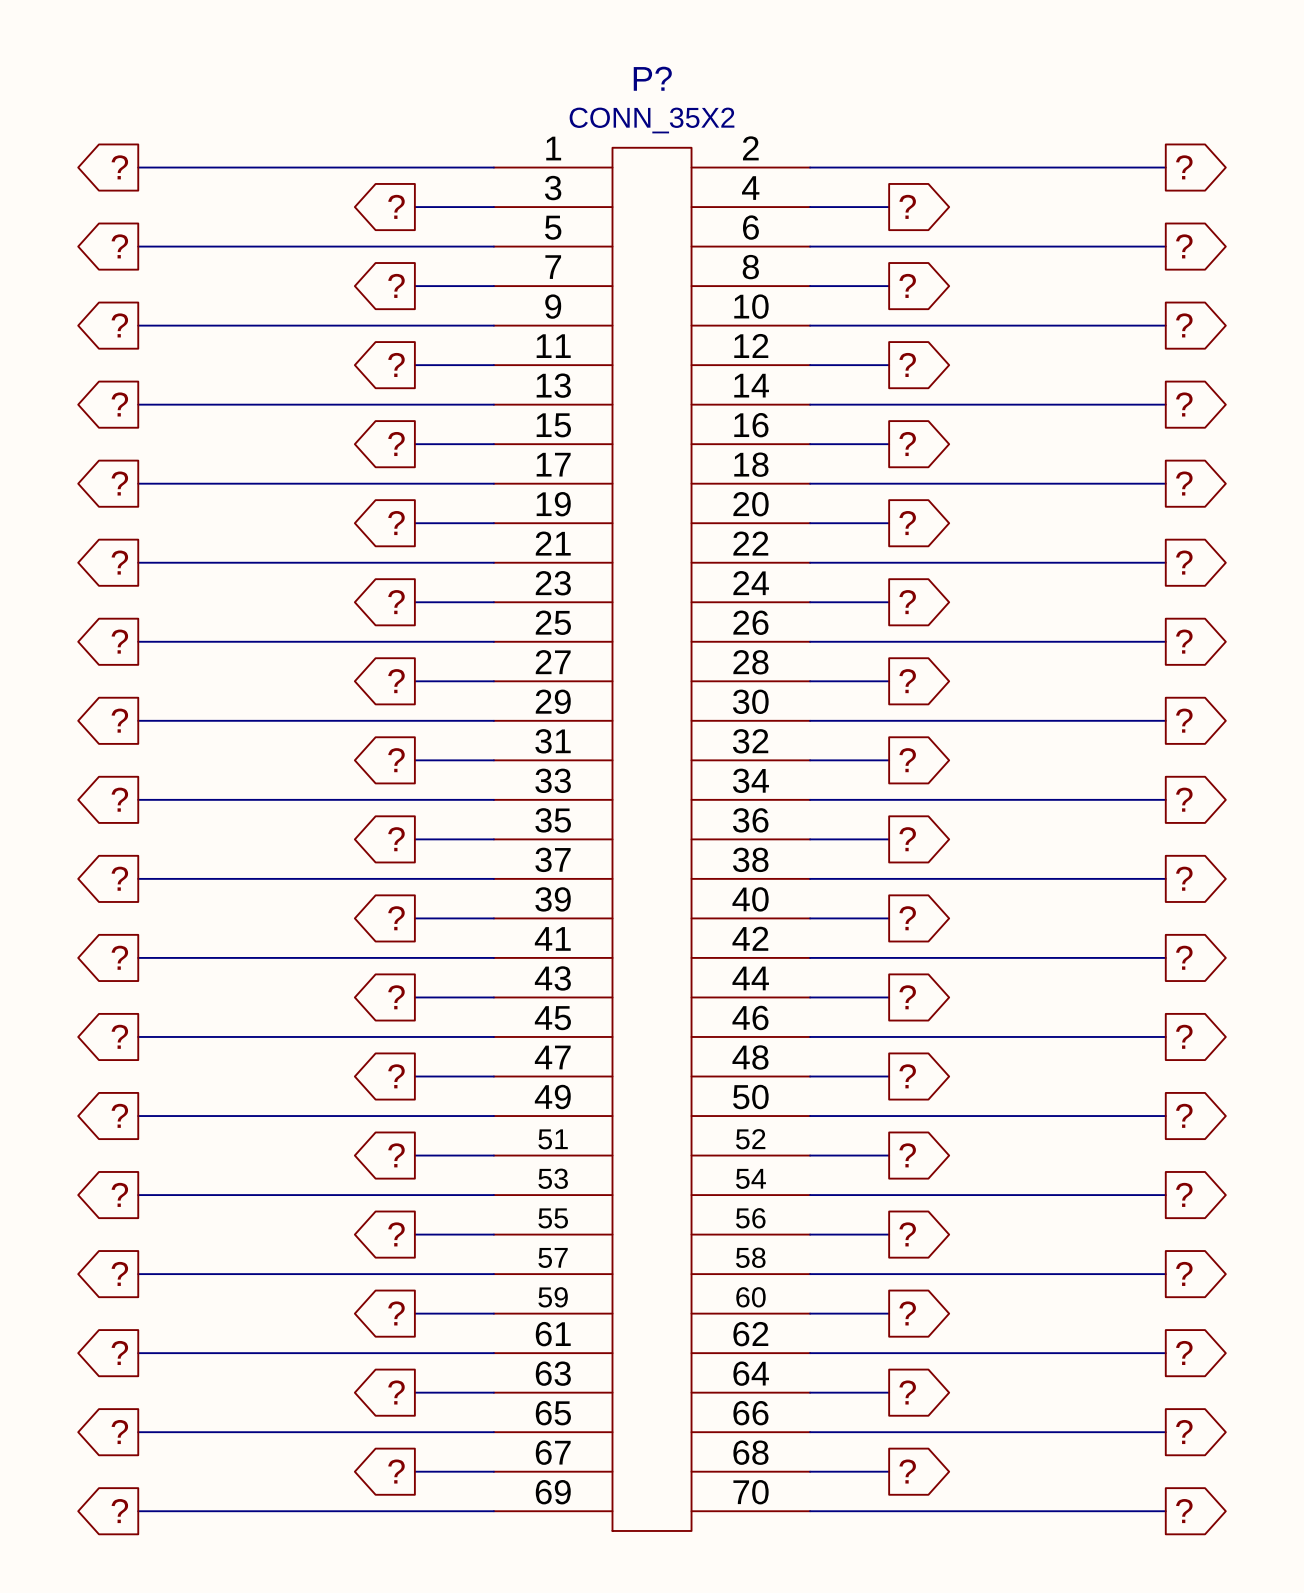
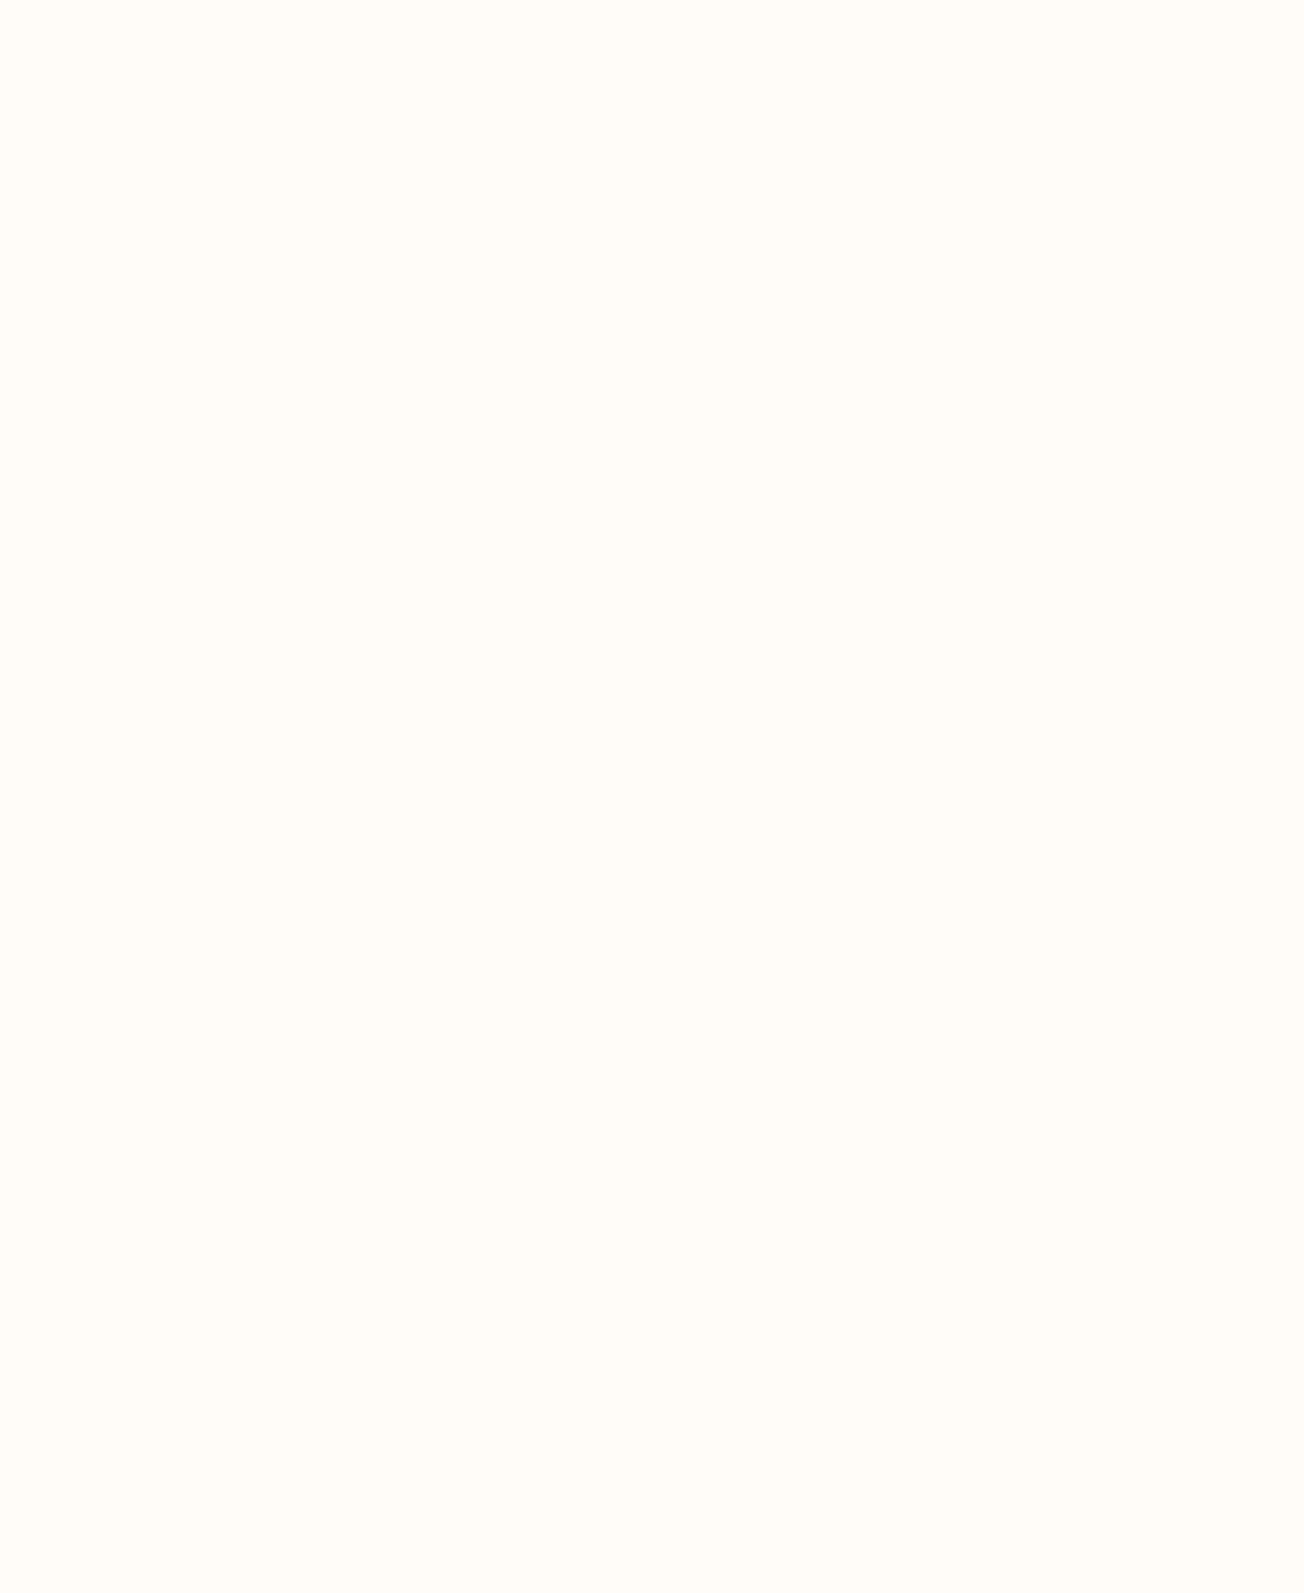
global label: ? (119, 167) -> none
wire: (138, 167) (493, 167) -> none
wire: (810, 167) (1165, 167) -> none
global label: ? (1184, 167) -> none
global label: ? (396, 206) -> none
global label: ? (907, 206) -> none
wire: (414, 207) (493, 207) -> none
wire: (810, 207) (889, 207) -> none
global label: ? (119, 246) -> none
wire: (138, 246) (493, 246) -> none
wire: (810, 246) (1165, 246) -> none
global label: ? (1184, 246) -> none
global label: ? (396, 285) -> none
global label: ? (907, 285) -> none
wire: (414, 286) (493, 286) -> none
wire: (810, 286) (889, 286) -> none
global label: ? (119, 325) -> none
wire: (138, 325) (493, 325) -> none
wire: (810, 325) (1165, 325) -> none
global label: ? (1184, 325) -> none
global label: ? (396, 364) -> none
global label: ? (907, 364) -> none
wire: (414, 365) (493, 365) -> none
wire: (810, 365) (889, 365) -> none
global label: ? (119, 404) -> none
wire: (138, 404) (493, 404) -> none
wire: (810, 404) (1165, 404) -> none
global label: ? (1184, 404) -> none
global label: ? (396, 444) -> none
wire: (414, 444) (493, 444) -> none
wire: (810, 444) (889, 444) -> none
global label: ? (907, 444) -> none
global label: ? (119, 483) -> none
wire: (138, 483) (493, 483) -> none
wire: (810, 483) (1165, 483) -> none
global label: ? (1184, 483) -> none
global label: ? (396, 523) -> none
wire: (414, 523) (493, 523) -> none
wire: (810, 523) (889, 523) -> none
global label: ? (907, 523) -> none
global label: ? (119, 562) -> none
wire: (138, 562) (493, 562) -> none
wire: (810, 562) (1165, 562) -> none
global label: ? (1184, 562) -> none
global label: ? (396, 602) -> none
wire: (414, 602) (493, 602) -> none
wire: (810, 602) (889, 602) -> none
global label: ? (907, 602) -> none
global label: ? (119, 641) -> none
wire: (138, 641) (493, 641) -> none
wire: (810, 641) (1165, 641) -> none
global label: ? (1184, 641) -> none
global label: ? (396, 681) -> none
wire: (414, 681) (493, 681) -> none
wire: (810, 681) (889, 681) -> none
global label: ? (907, 681) -> none
global label: ? (119, 720) -> none
wire: (138, 720) (493, 720) -> none
wire: (810, 720) (1165, 720) -> none
global label: ? (1184, 720) -> none
global label: ? (396, 760) -> none
wire: (414, 760) (493, 760) -> none
wire: (810, 760) (889, 760) -> none
global label: ? (907, 760) -> none
global label: ? (119, 799) -> none
wire: (138, 799) (493, 799) -> none
wire: (810, 799) (1165, 799) -> none
global label: ? (1184, 799) -> none
global label: ? (396, 839) -> none
wire: (414, 839) (493, 839) -> none
P?: CONN_35X2 (652, 839) -> none
wire: (810, 839) (889, 839) -> none
global label: ? (907, 839) -> none
global label: ? (119, 878) -> none
wire: (138, 878) (493, 878) -> none
wire: (810, 878) (1165, 878) -> none
global label: ? (1184, 878) -> none
global label: ? (396, 918) -> none
wire: (414, 918) (493, 918) -> none
wire: (810, 918) (889, 918) -> none
global label: ? (907, 918) -> none
global label: ? (119, 957) -> none
wire: (138, 957) (493, 957) -> none
wire: (810, 957) (1165, 957) -> none
global label: ? (1184, 957) -> none
global label: ? (396, 997) -> none
wire: (414, 997) (493, 997) -> none
wire: (810, 997) (889, 997) -> none
global label: ? (907, 997) -> none
global label: ? (119, 1036) -> none
wire: (138, 1036) (493, 1036) -> none
wire: (810, 1036) (1165, 1036) -> none
global label: ? (1184, 1036) -> none
global label: ? (396, 1076) -> none
wire: (414, 1076) (493, 1076) -> none
wire: (810, 1076) (889, 1076) -> none
global label: ? (907, 1076) -> none
global label: ? (119, 1115) -> none
global label: ? (1184, 1115) -> none
wire: (138, 1116) (493, 1116) -> none
wire: (810, 1116) (1165, 1116) -> none
global label: ? (396, 1155) -> none
wire: (414, 1155) (493, 1155) -> none
wire: (810, 1155) (889, 1155) -> none
global label: ? (907, 1155) -> none
global label: ? (119, 1194) -> none
global label: ? (1184, 1194) -> none
wire: (138, 1195) (493, 1195) -> none
wire: (810, 1195) (1165, 1195) -> none
global label: ? (396, 1234) -> none
wire: (414, 1234) (493, 1234) -> none
wire: (810, 1234) (889, 1234) -> none
global label: ? (907, 1234) -> none
global label: ? (119, 1273) -> none
global label: ? (1184, 1273) -> none
wire: (138, 1274) (493, 1274) -> none
wire: (810, 1274) (1165, 1274) -> none
global label: ? (396, 1313) -> none
wire: (414, 1313) (493, 1313) -> none
wire: (810, 1313) (889, 1313) -> none
global label: ? (907, 1313) -> none
global label: ? (119, 1352) -> none
global label: ? (1184, 1352) -> none
wire: (138, 1353) (493, 1353) -> none
wire: (810, 1353) (1165, 1353) -> none
global label: ? (396, 1392) -> none
wire: (414, 1392) (493, 1392) -> none
wire: (810, 1392) (889, 1392) -> none
global label: ? (907, 1392) -> none
global label: ? (119, 1432) -> none
wire: (138, 1432) (493, 1432) -> none
wire: (810, 1432) (1165, 1432) -> none
global label: ? (1184, 1432) -> none
global label: ? (396, 1471) -> none
wire: (414, 1471) (493, 1471) -> none
wire: (810, 1471) (889, 1471) -> none
global label: ? (907, 1471) -> none
global label: ? (119, 1511) -> none
wire: (138, 1511) (493, 1511) -> none
wire: (810, 1511) (1165, 1511) -> none
global label: ? (1184, 1511) -> none

